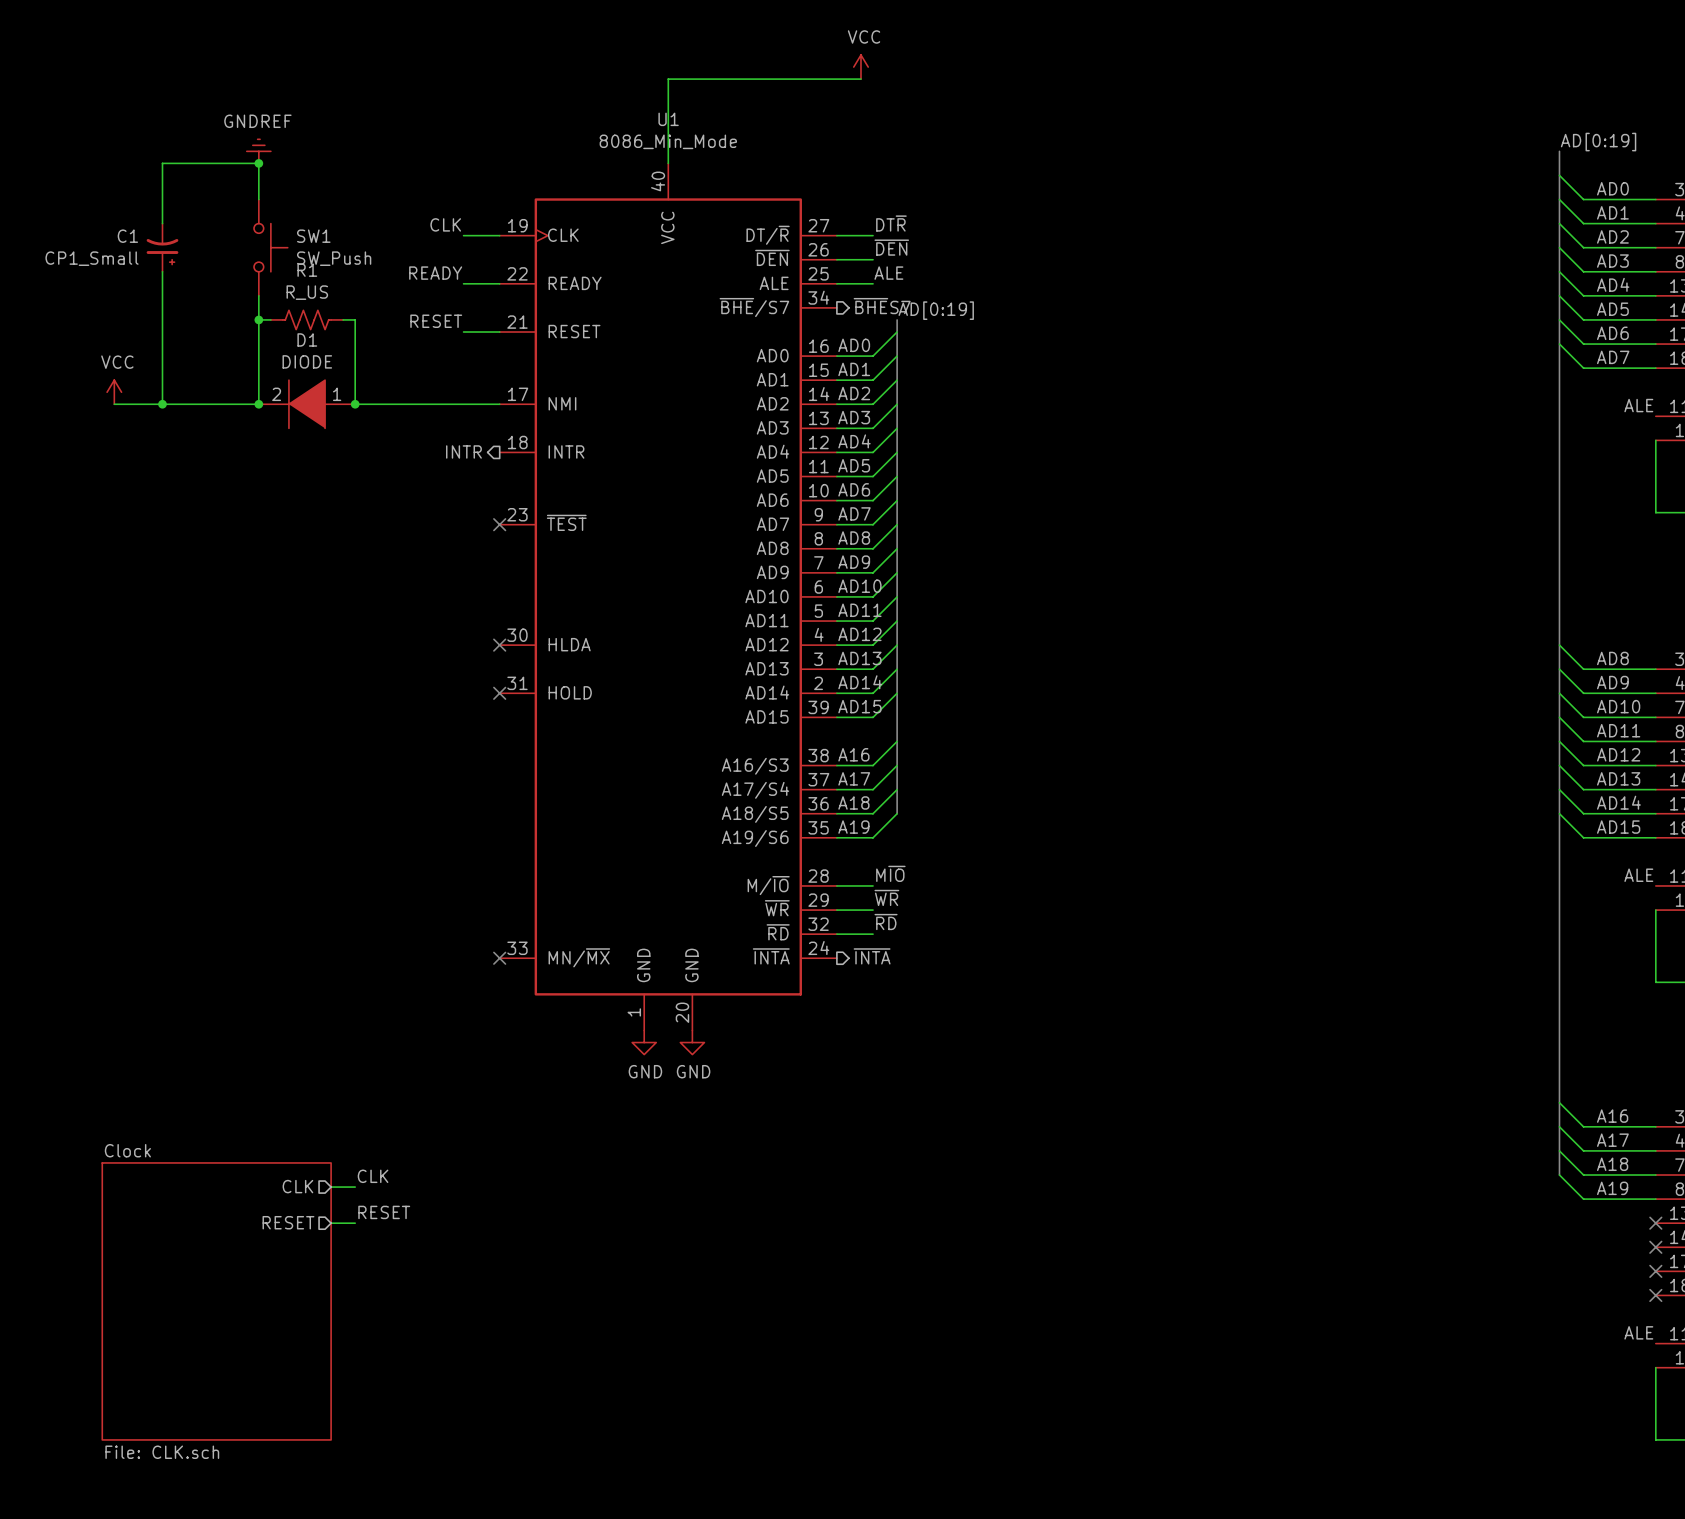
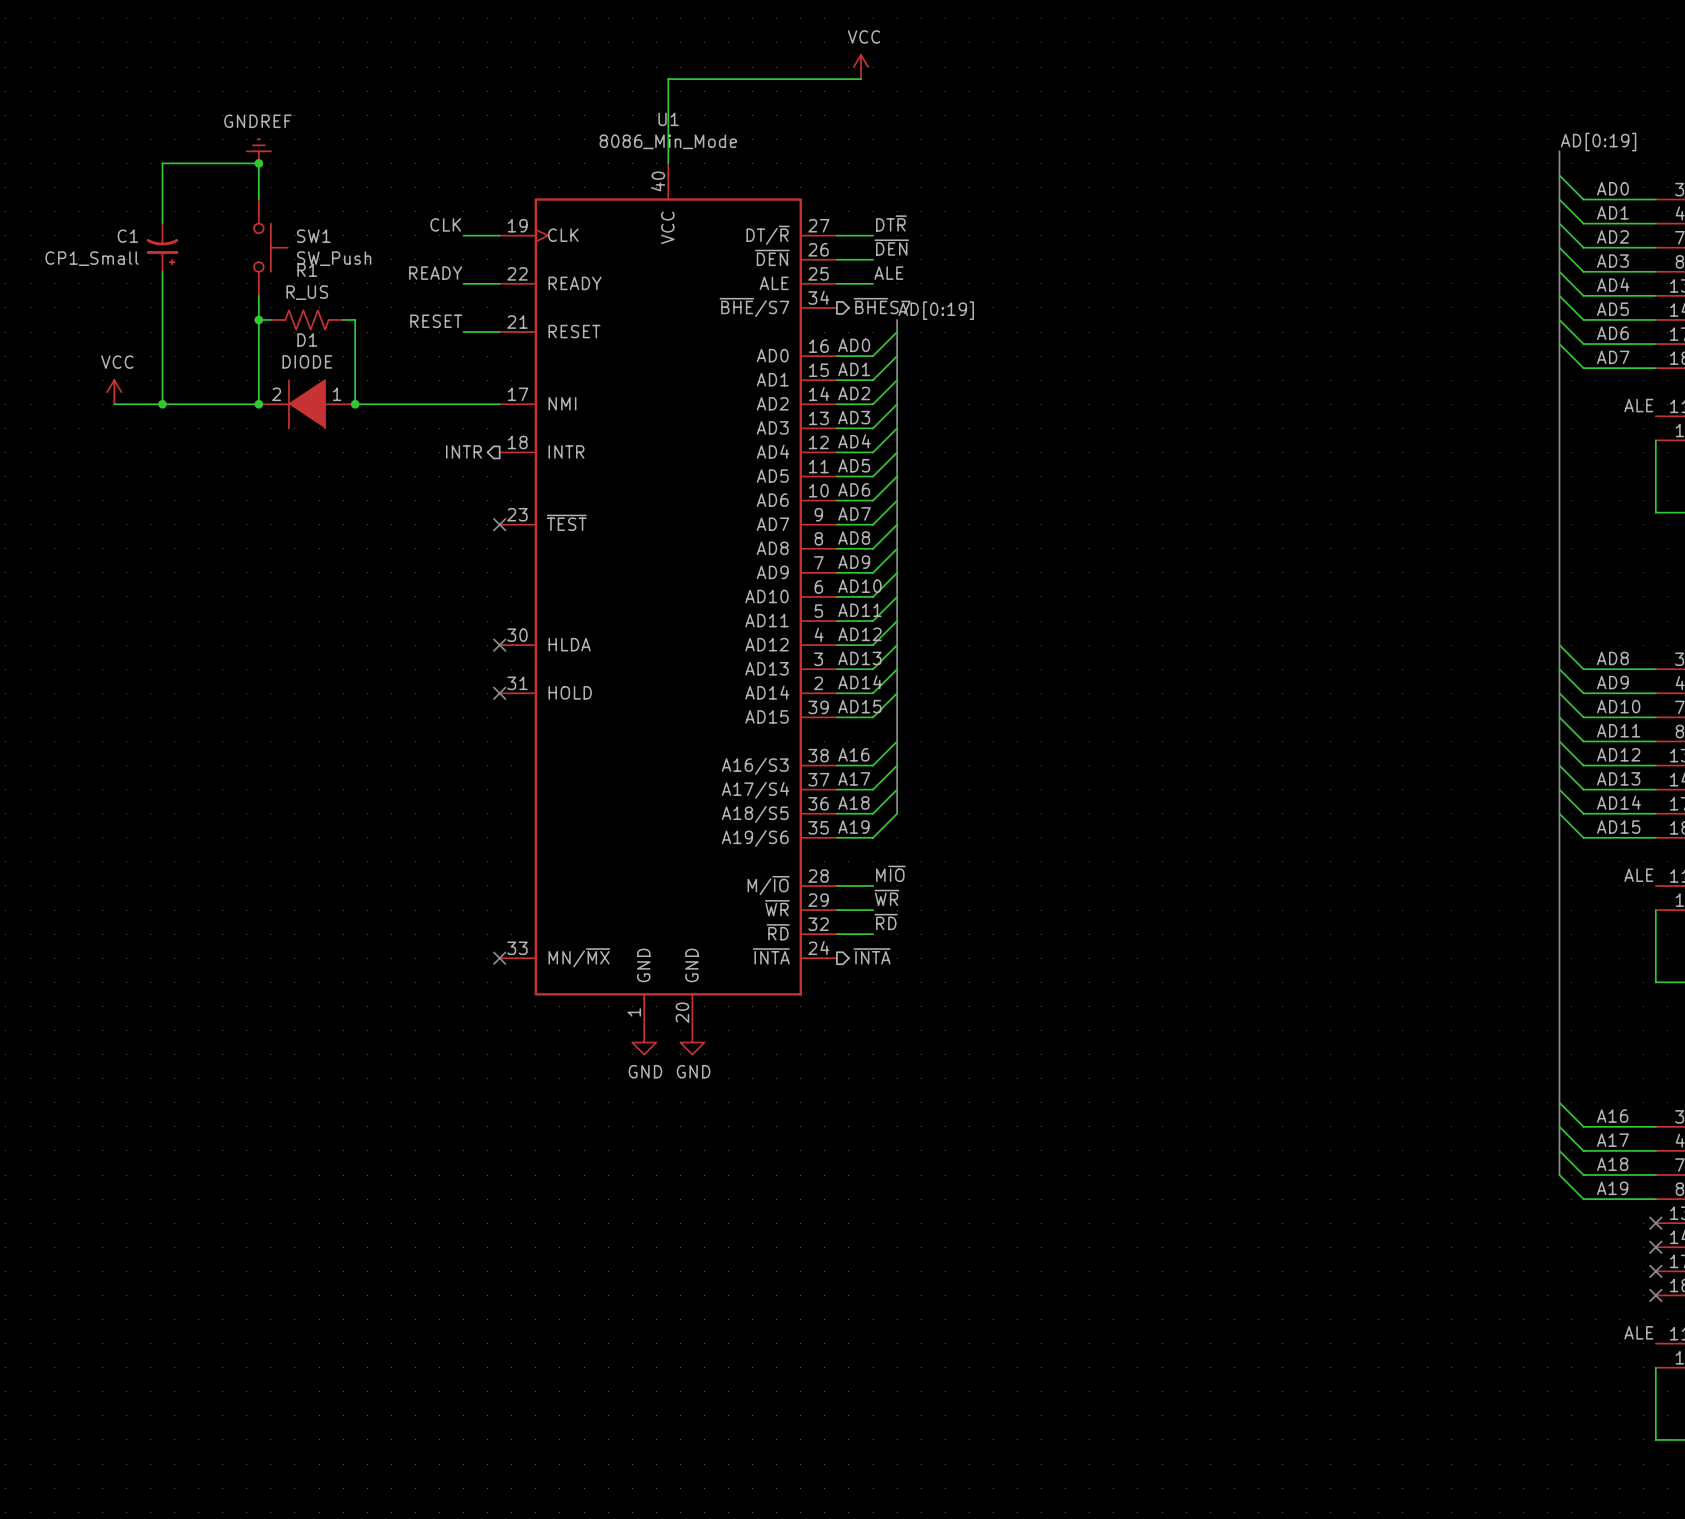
label: CLK (373, 1176) -> none
sheet pin: CLK (297, 1186) -> none
wire: (331, 1187) (355, 1187) -> none
label: RESET (384, 1212) -> none
sheet pin: RESET (288, 1222) -> none
wire: (331, 1223) (355, 1223) -> none
sheet Clock: File: CLK.sch (216, 1301) -> none

